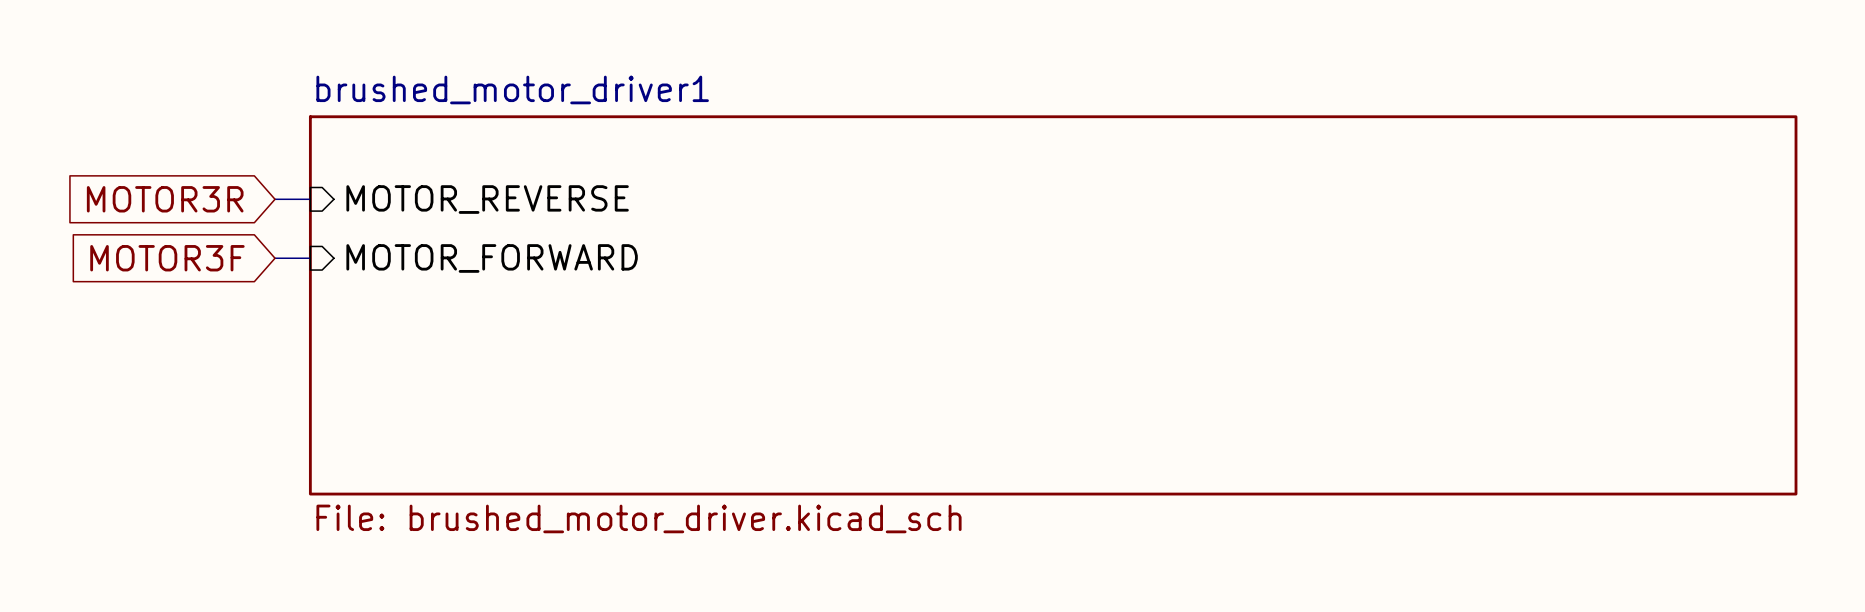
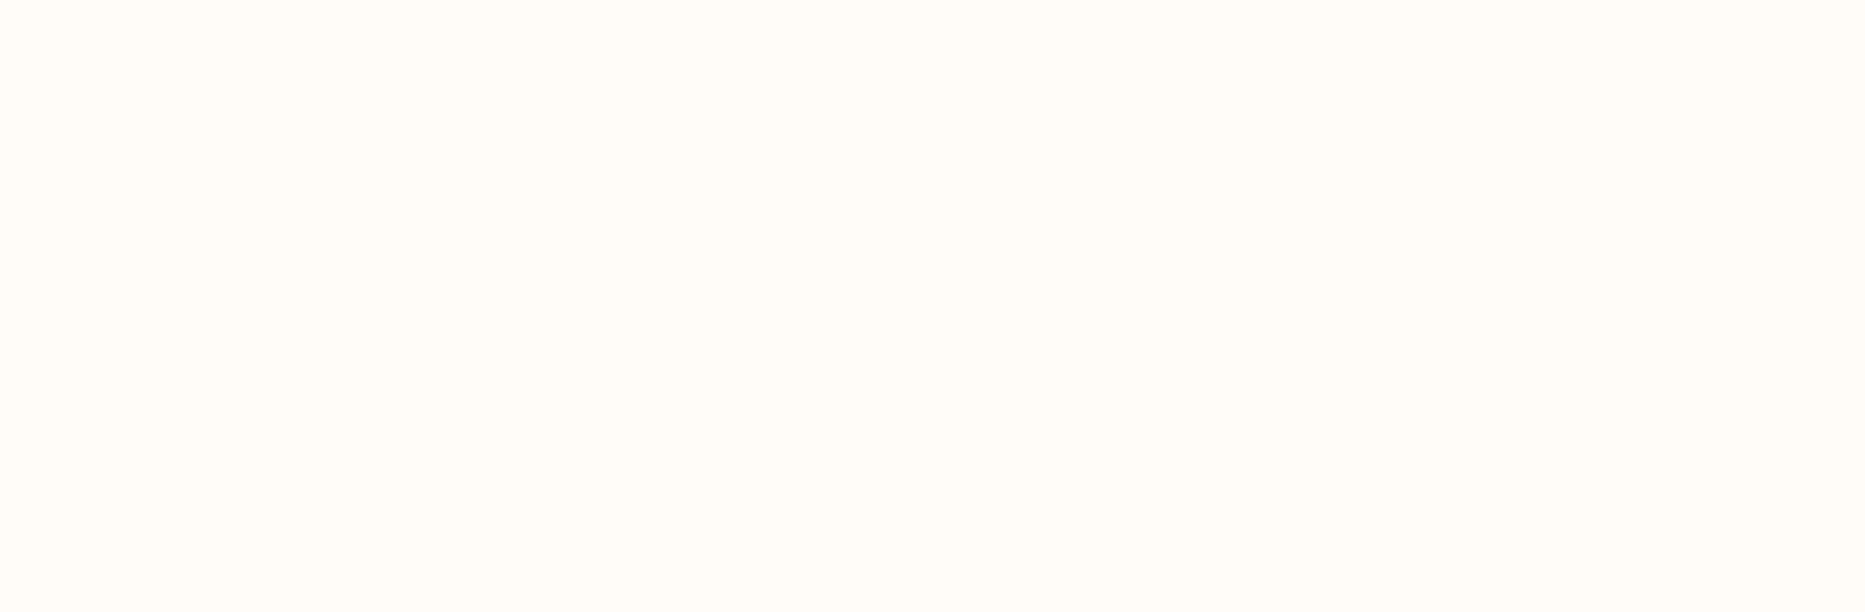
global label: MOTOR3R (165, 199) -> none
wire: (275, 199) (310, 199) -> none
sheet pin: MOTOR_REVERSE (487, 199) -> none
global label: MOTOR3F (167, 258) -> none
wire: (275, 258) (310, 258) -> none
sheet pin: MOTOR_FORWARD (492, 258) -> none
sheet brushed_motor_driver1: File: brushed_motor_driver.kicad_sch (1053, 305) -> none

